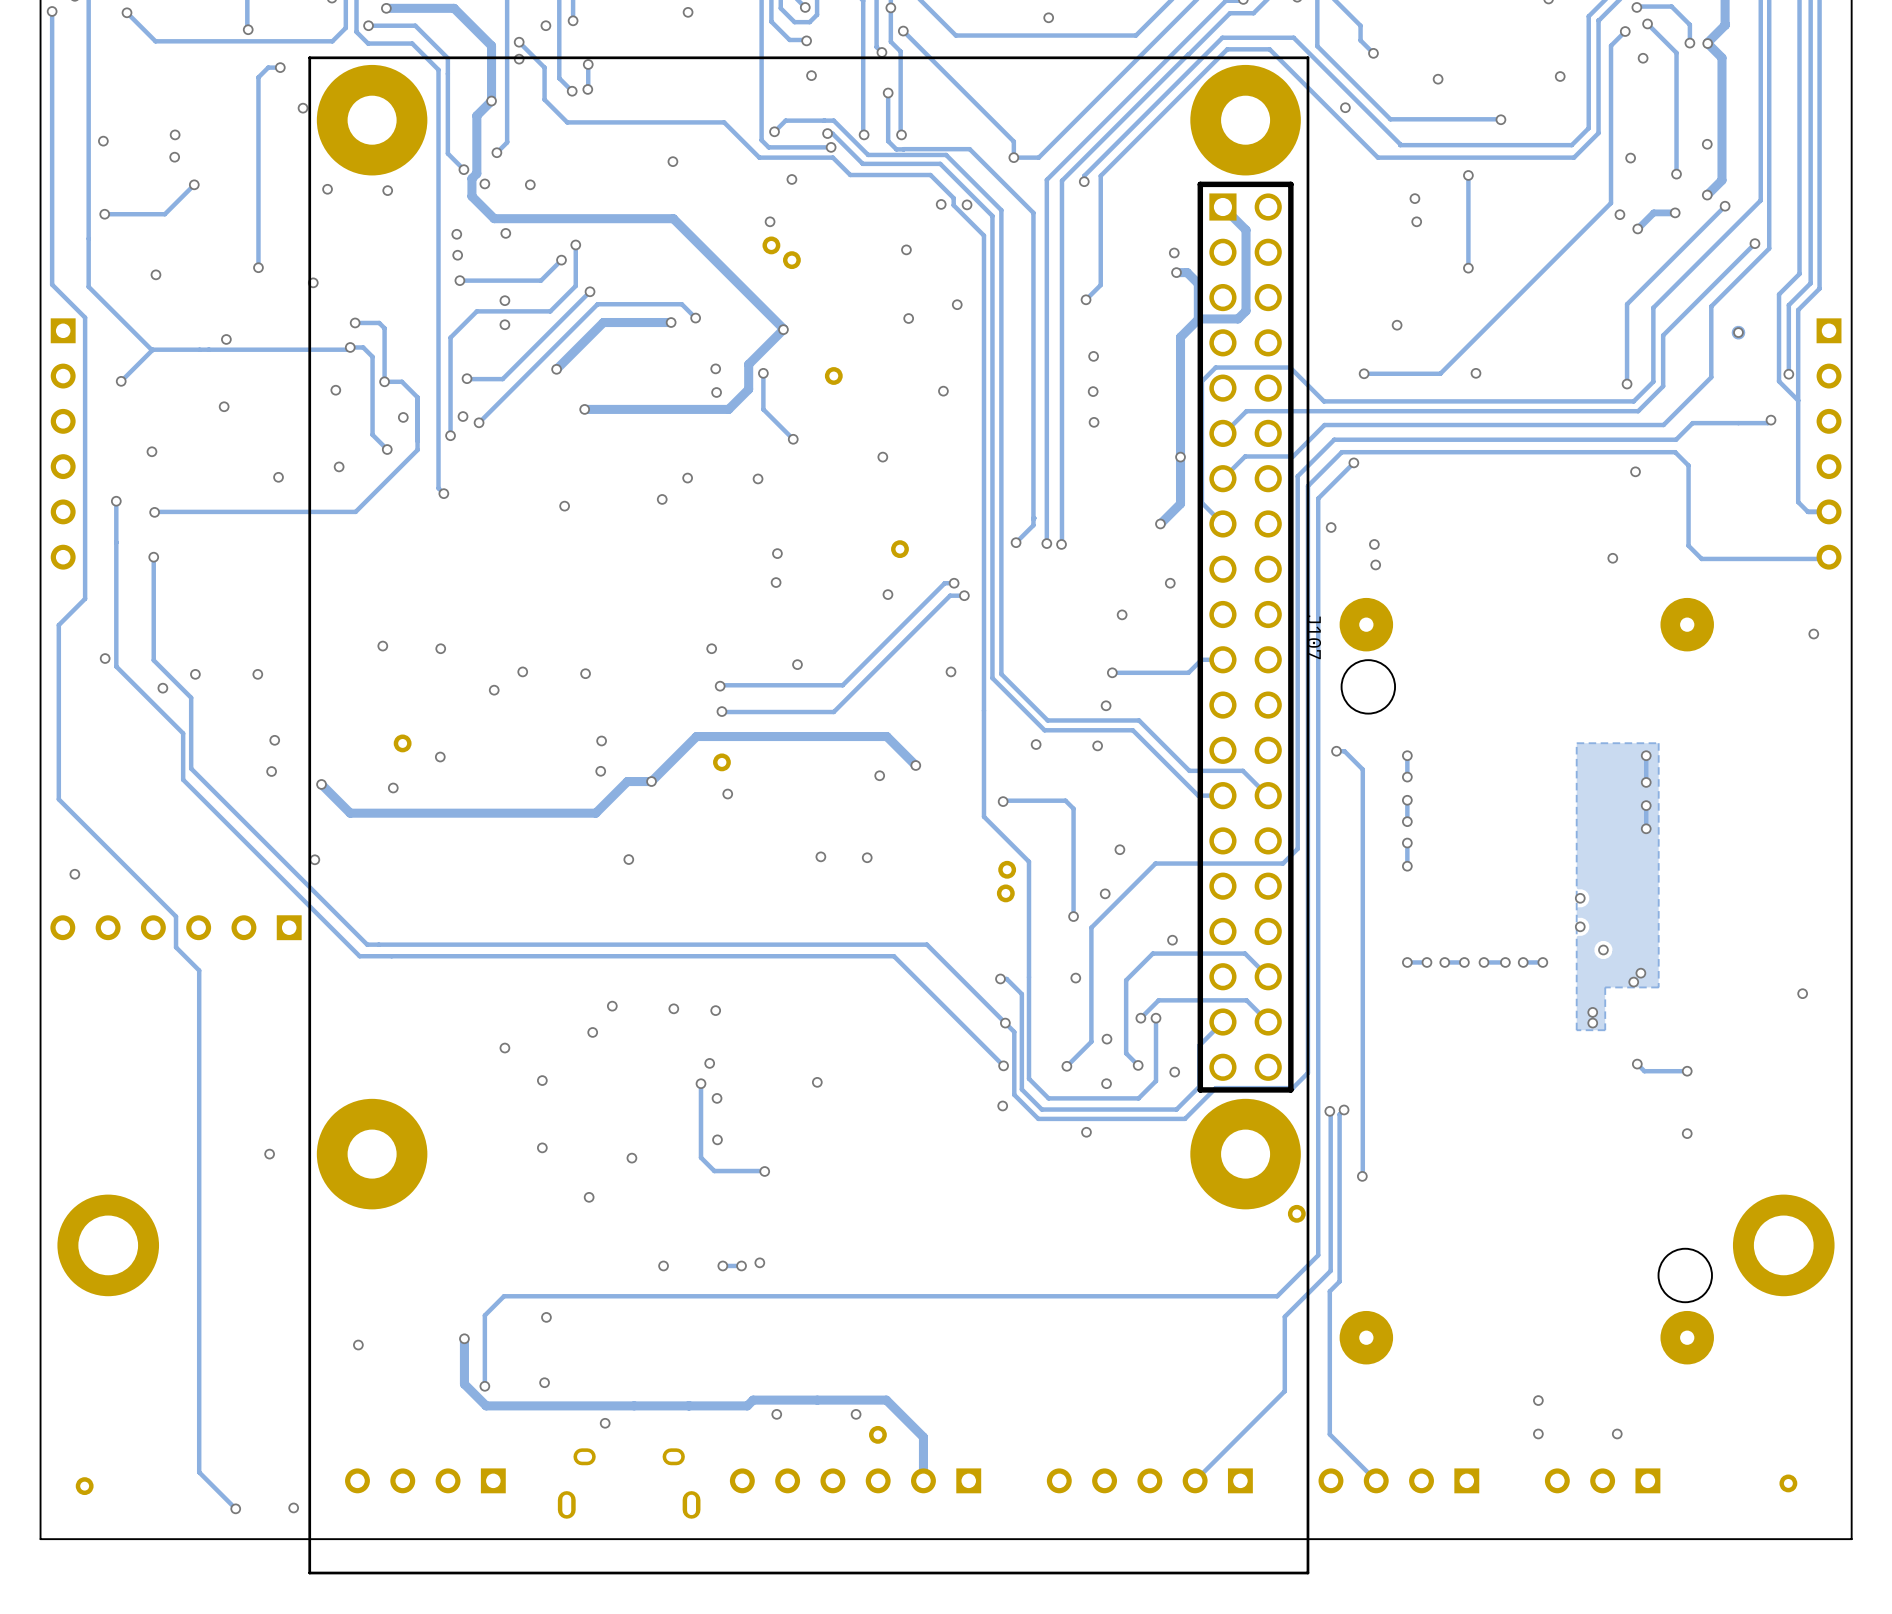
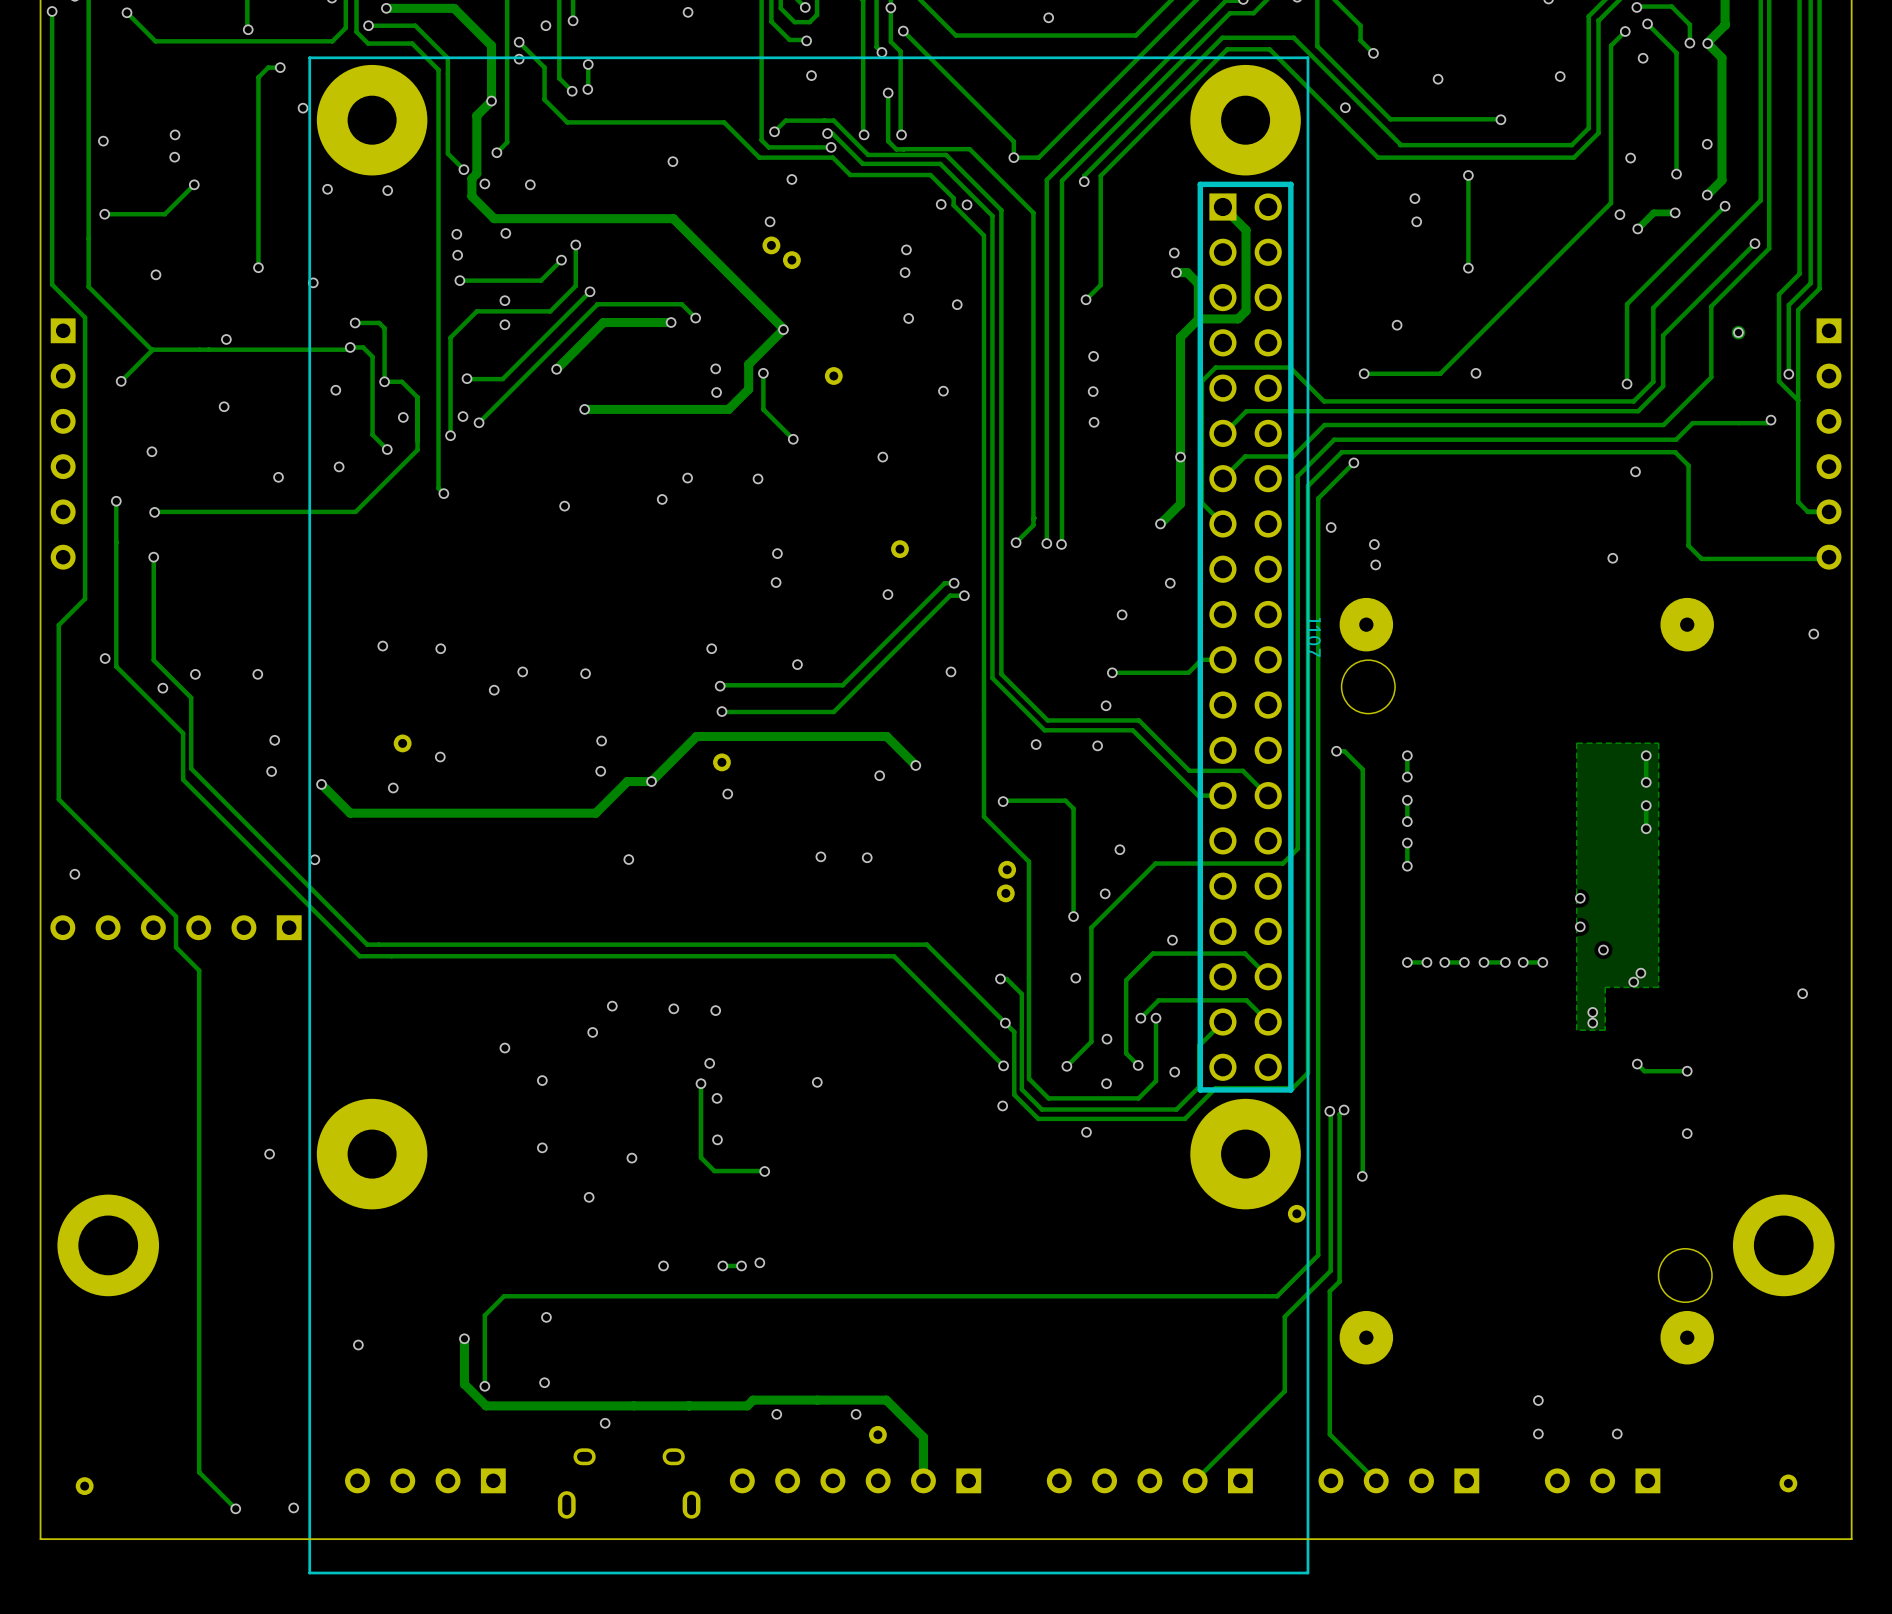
via: none -> (905, 272)

